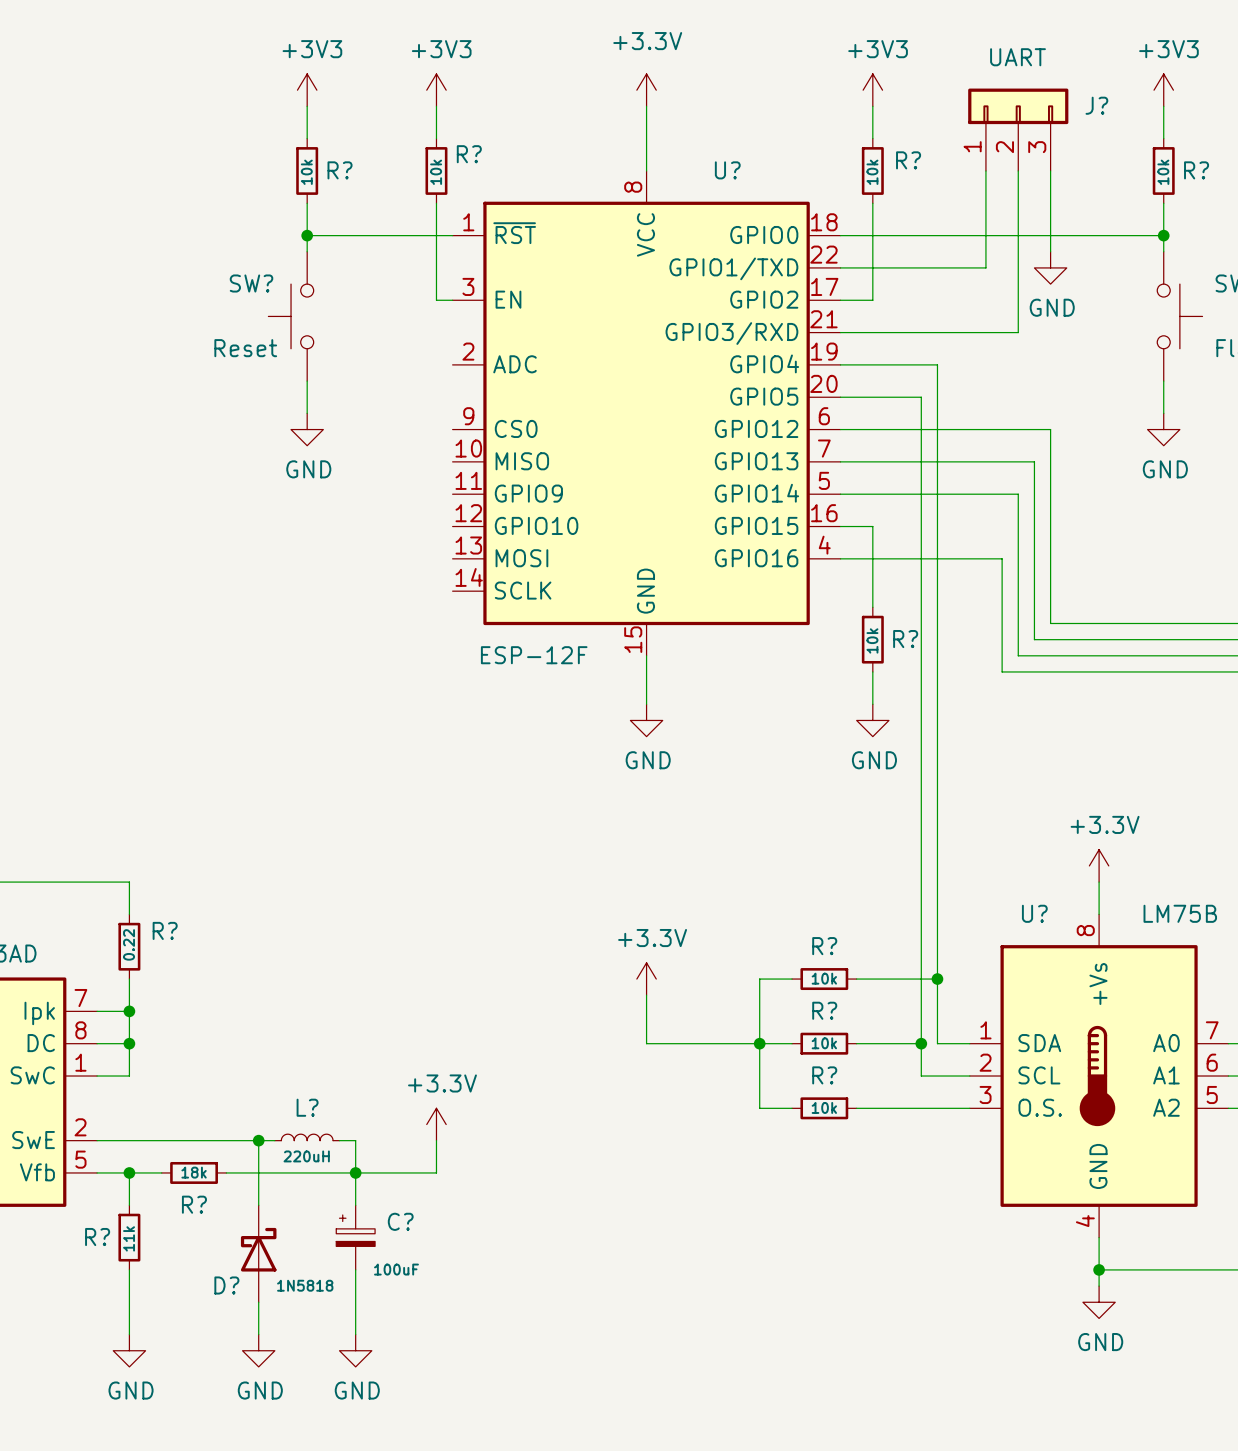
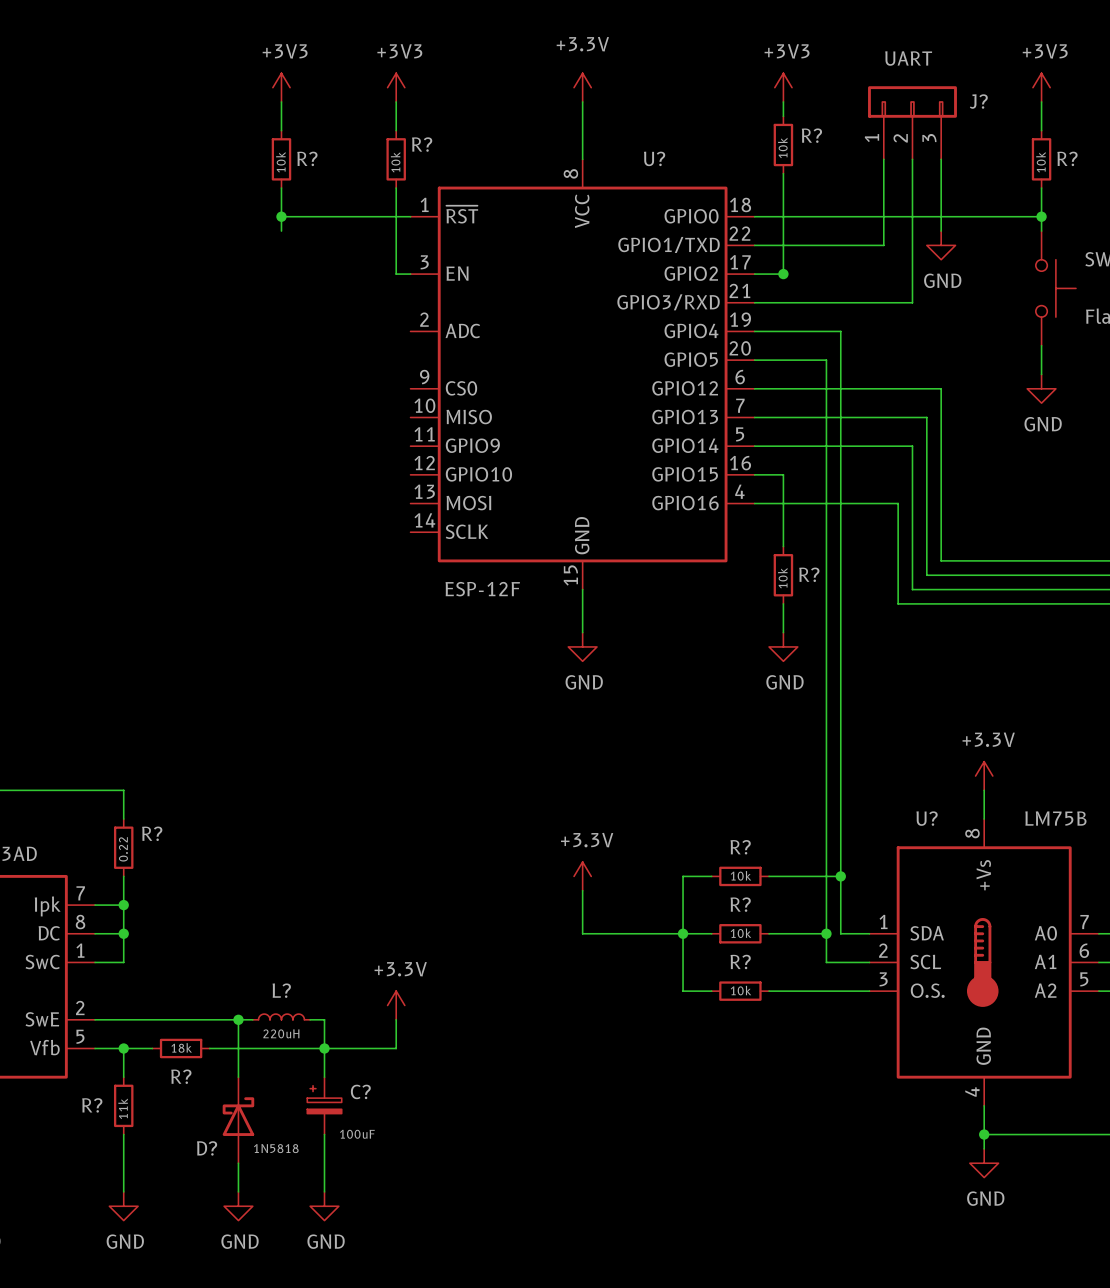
R? position: (872, 170) -> (783, 145)
junction: none -> (783, 274)
SW?: Reset (291, 316) -> none
wire: (307, 381) (307, 413) -> none
power symbol: GND (307, 429) -> none

